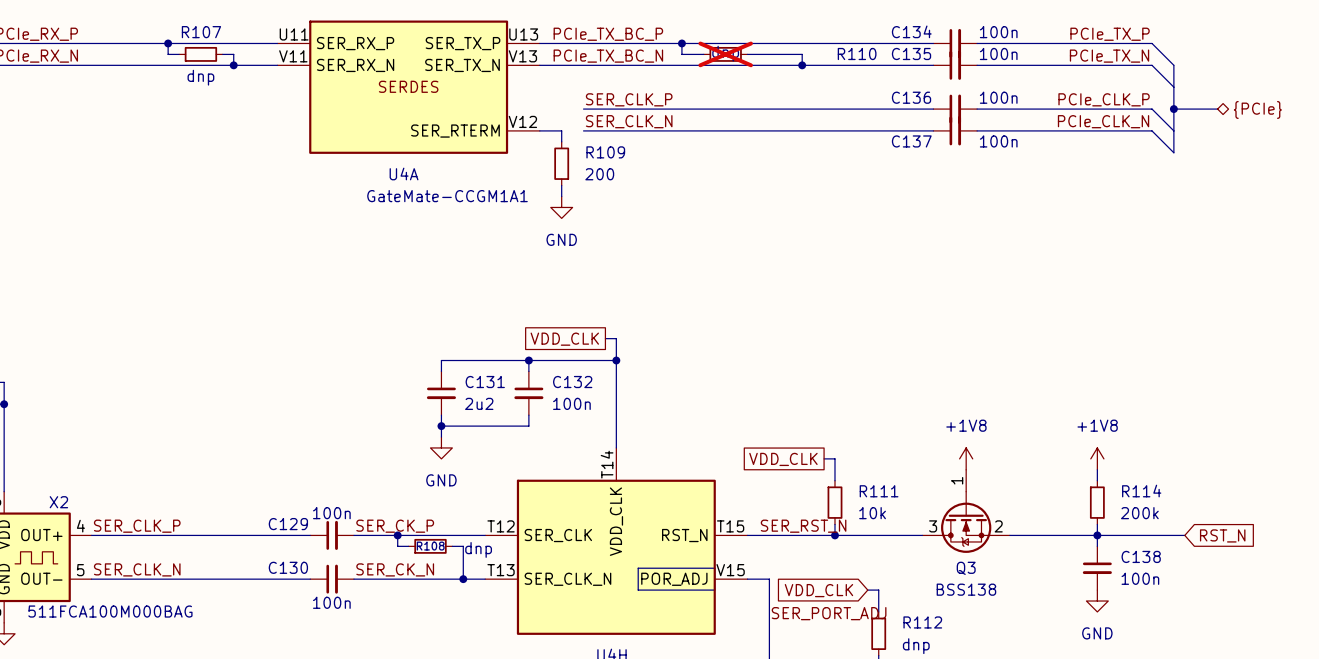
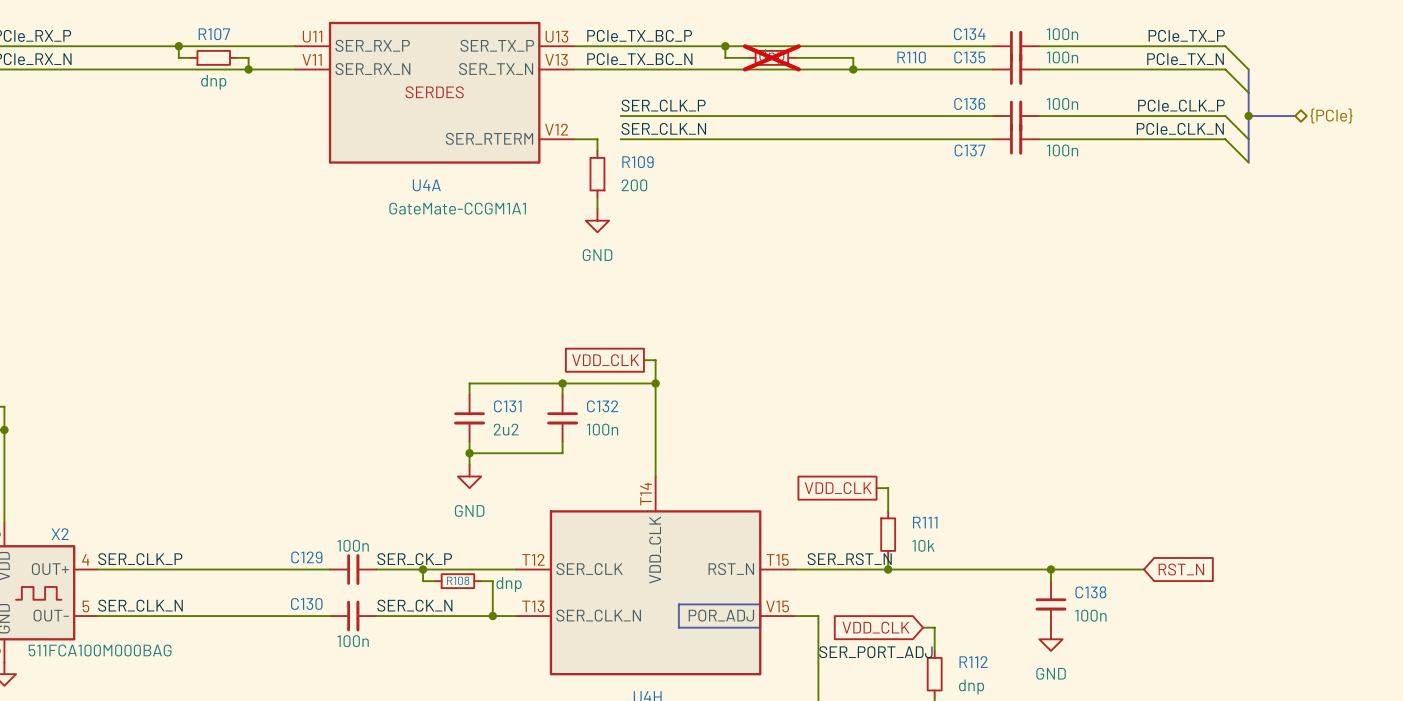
power symbol: +1V8 (966, 458) -> none
power symbol: +1V8 (1097, 458) -> none
wire: (1097, 469) (1097, 480) -> (1050, 569) (1050, 581)
R114: 200k (1097, 502) -> none
Q3: BSS138 (966, 511) -> none
wire: (1097, 524) (1097, 546) -> none
junction: none -> (1050, 569)
wire: (1075, 535) (1184, 535) -> none
junction: (1097, 535) -> none
global label position: RST_N (1222, 535) -> RST_N (1181, 569)
C138 position: (1097, 568) -> (1050, 604)
power symbol position: GND (1097, 601) -> GND (1050, 639)

